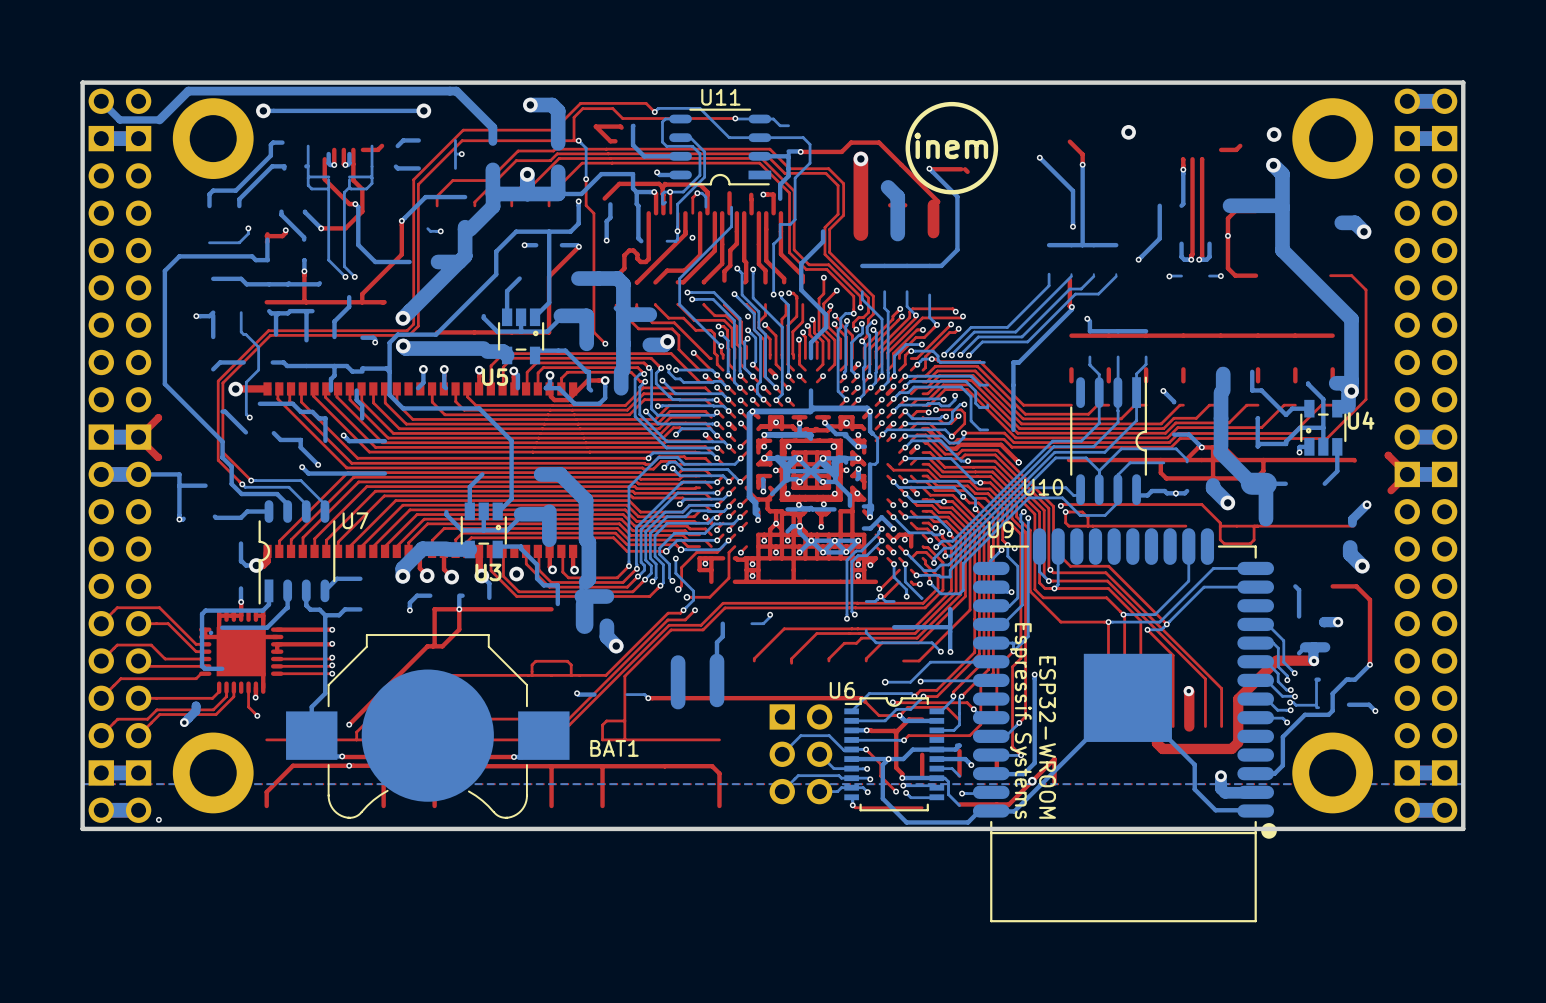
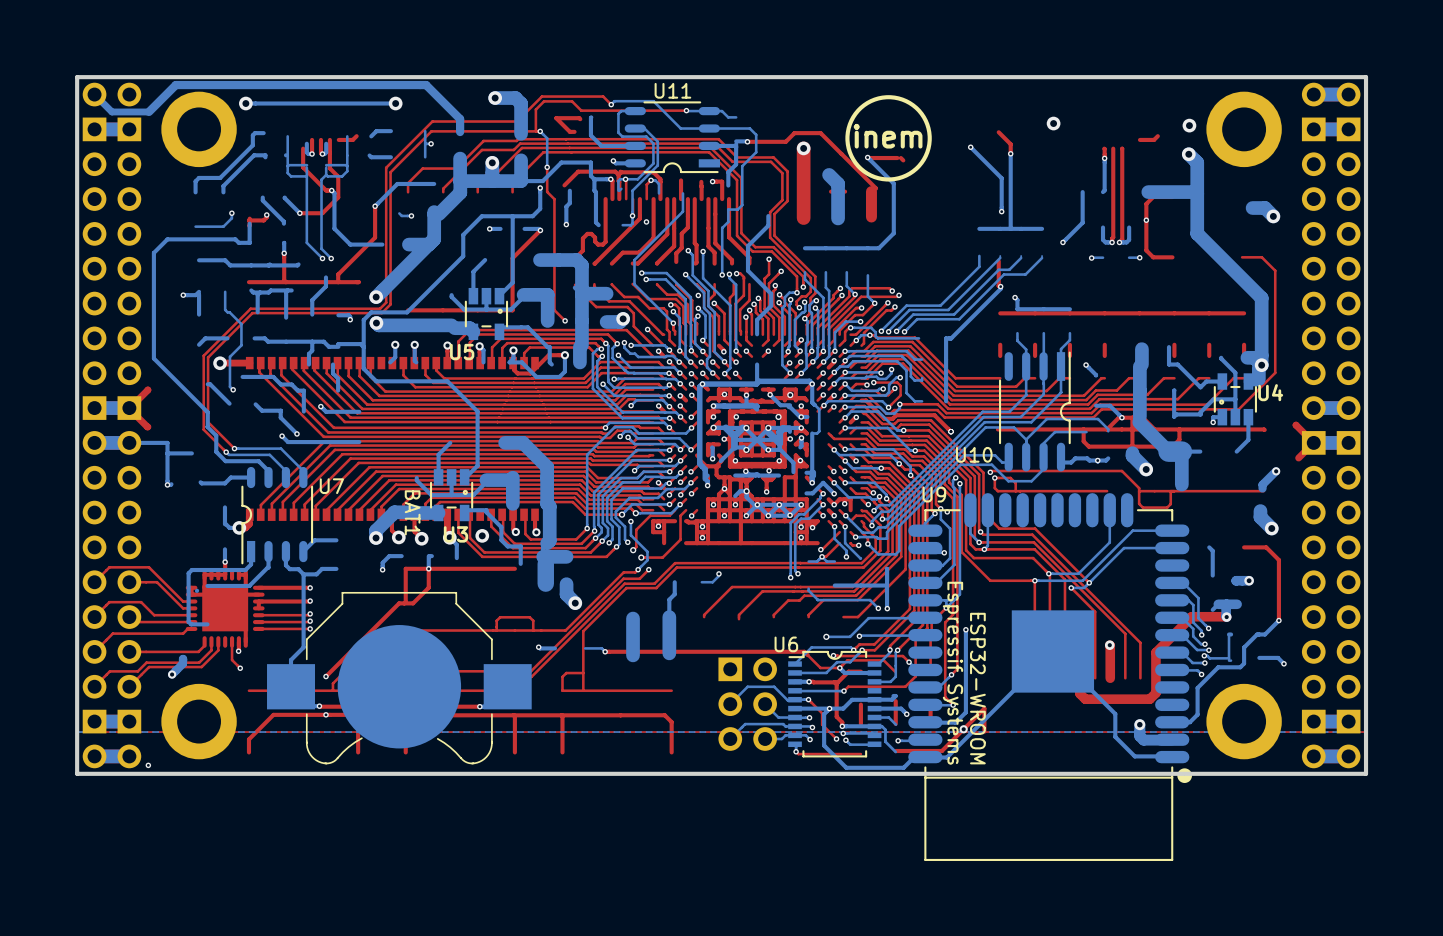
BAT1 name rotation: 0° (614, 748) -> 90° clockwise (412, 512)
BAT1 name position: BAT1 (614, 748) -> BAT1 (412, 512)

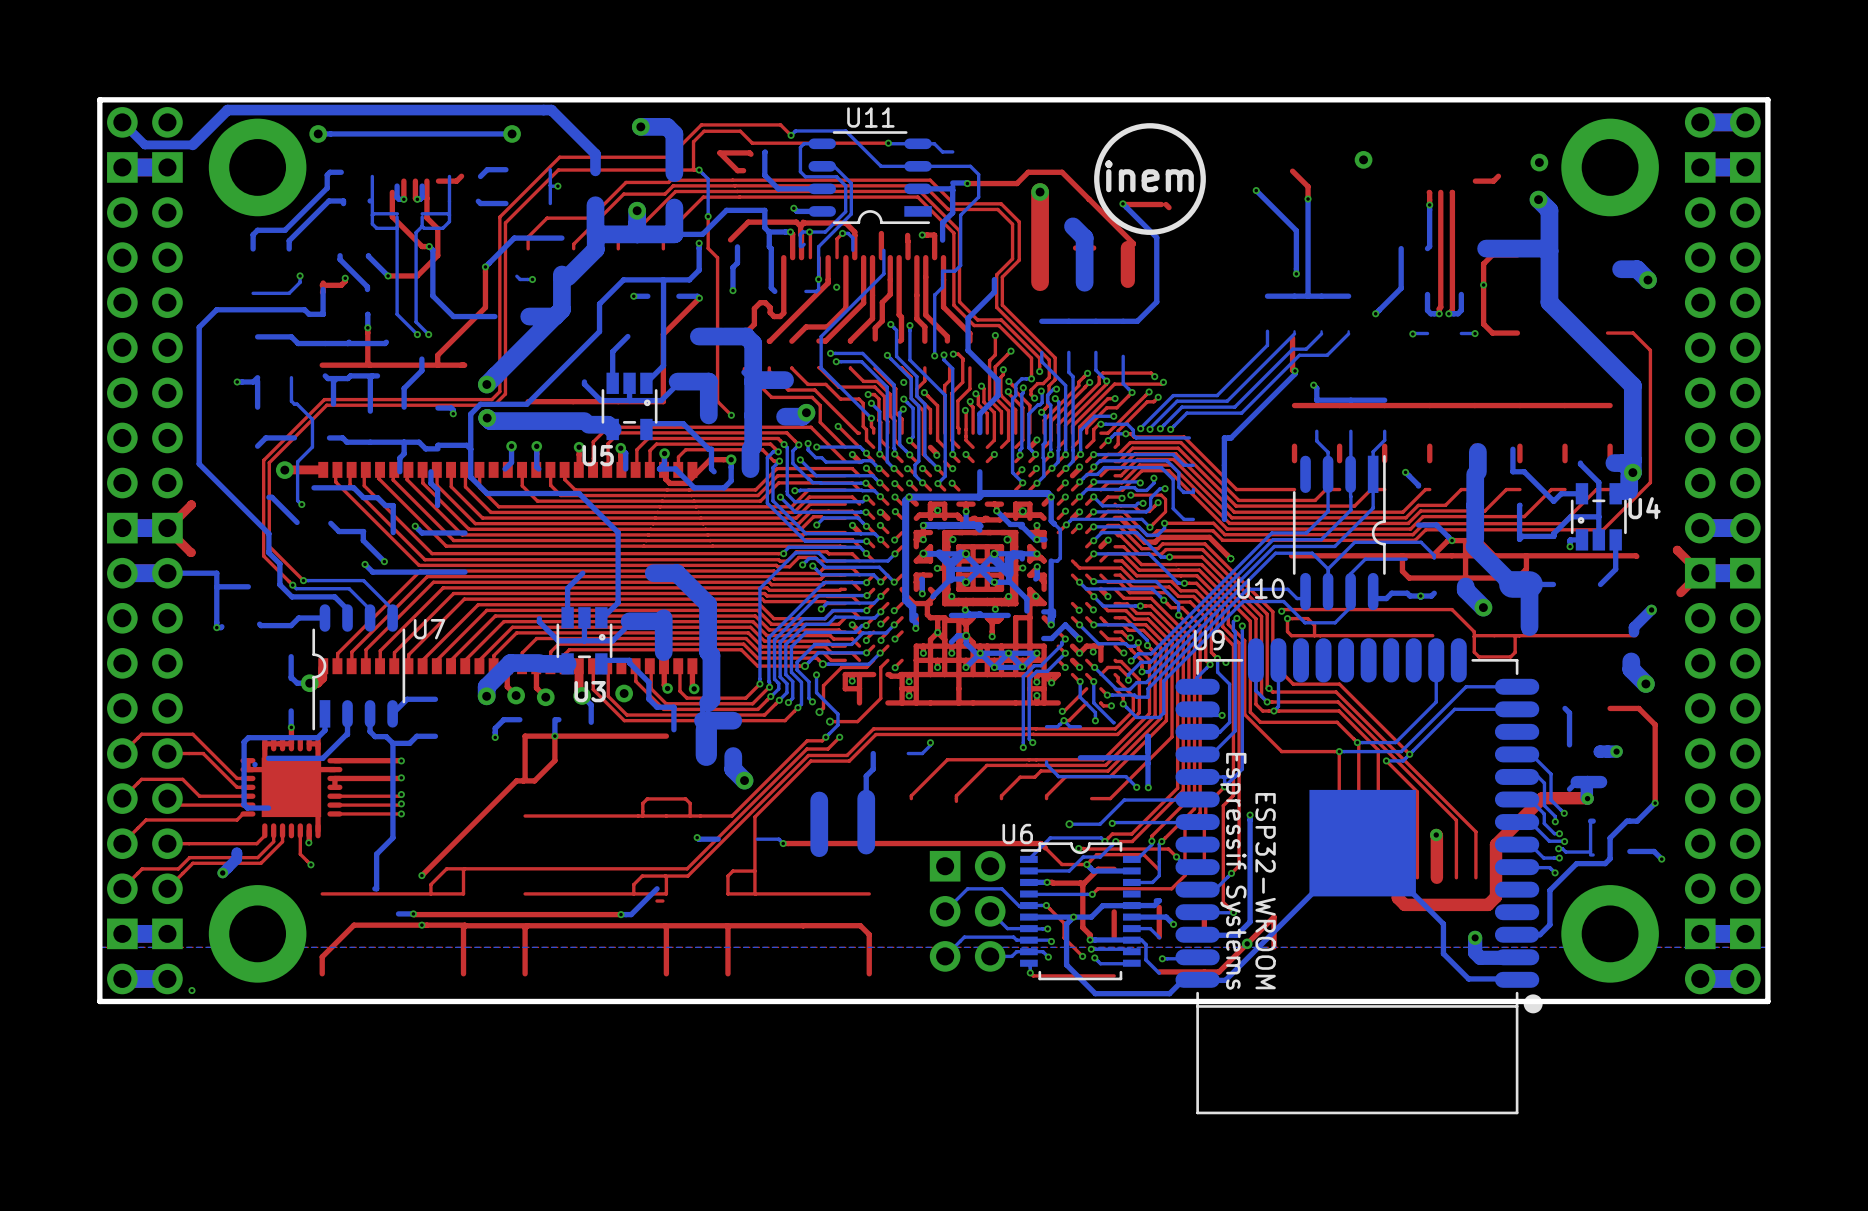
BAT1: (399, 678) -> none

